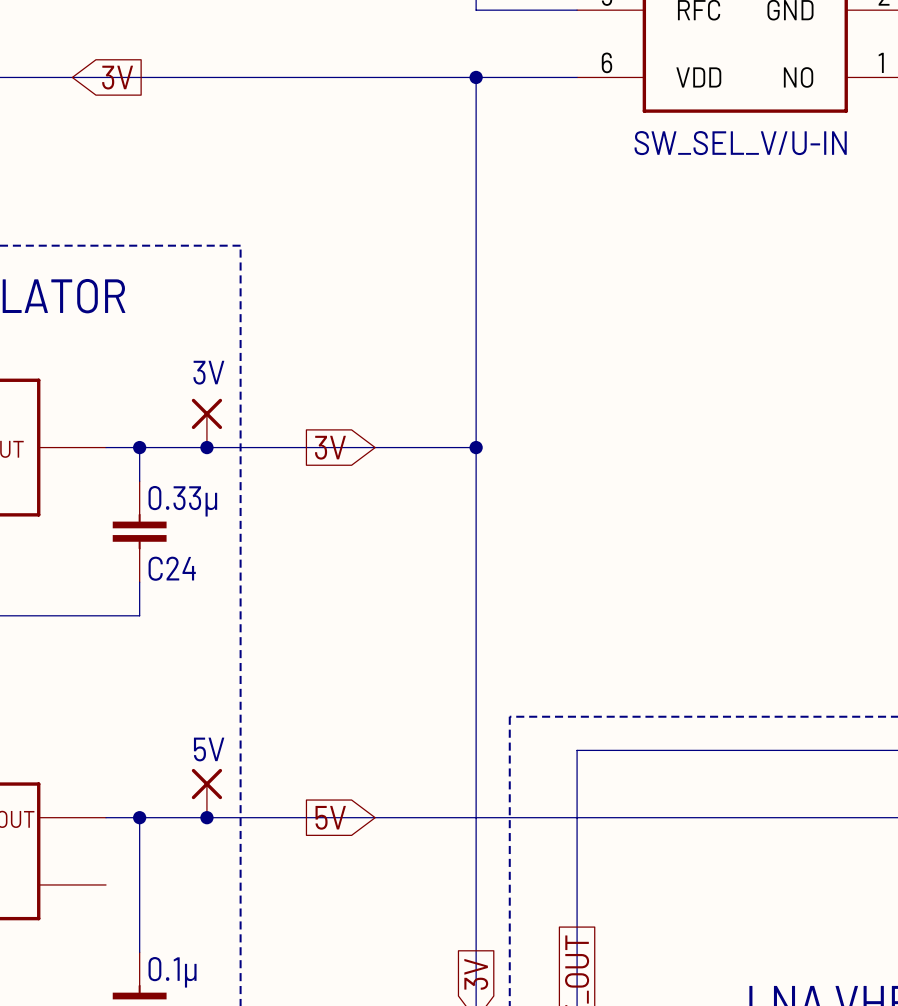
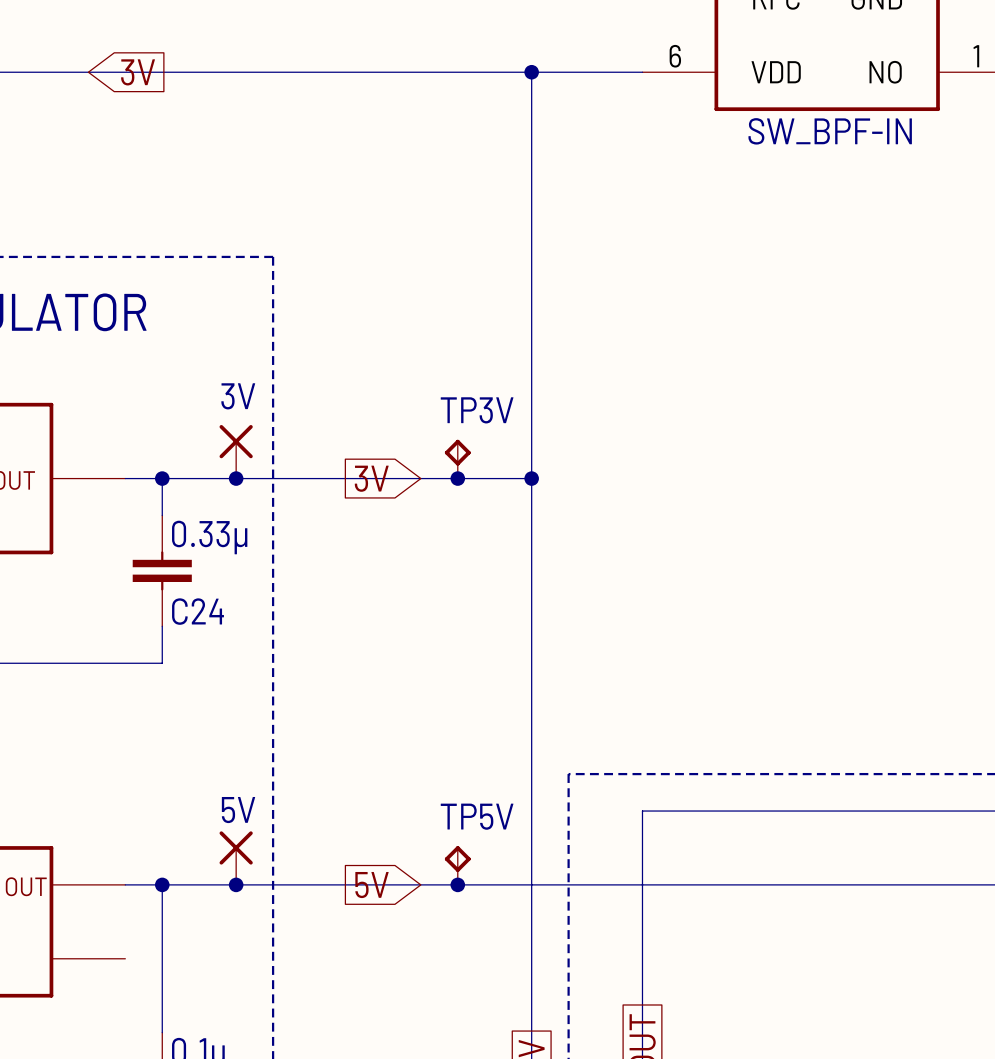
SW_SEL_V/U-IN name: SW_SEL_V/U-IN (740, 143) -> SW_BPF-IN (830, 131)
TP3V: none -> (457, 459)
junction: none -> (457, 478)
TP5V: none -> (457, 865)
junction: none -> (457, 884)

